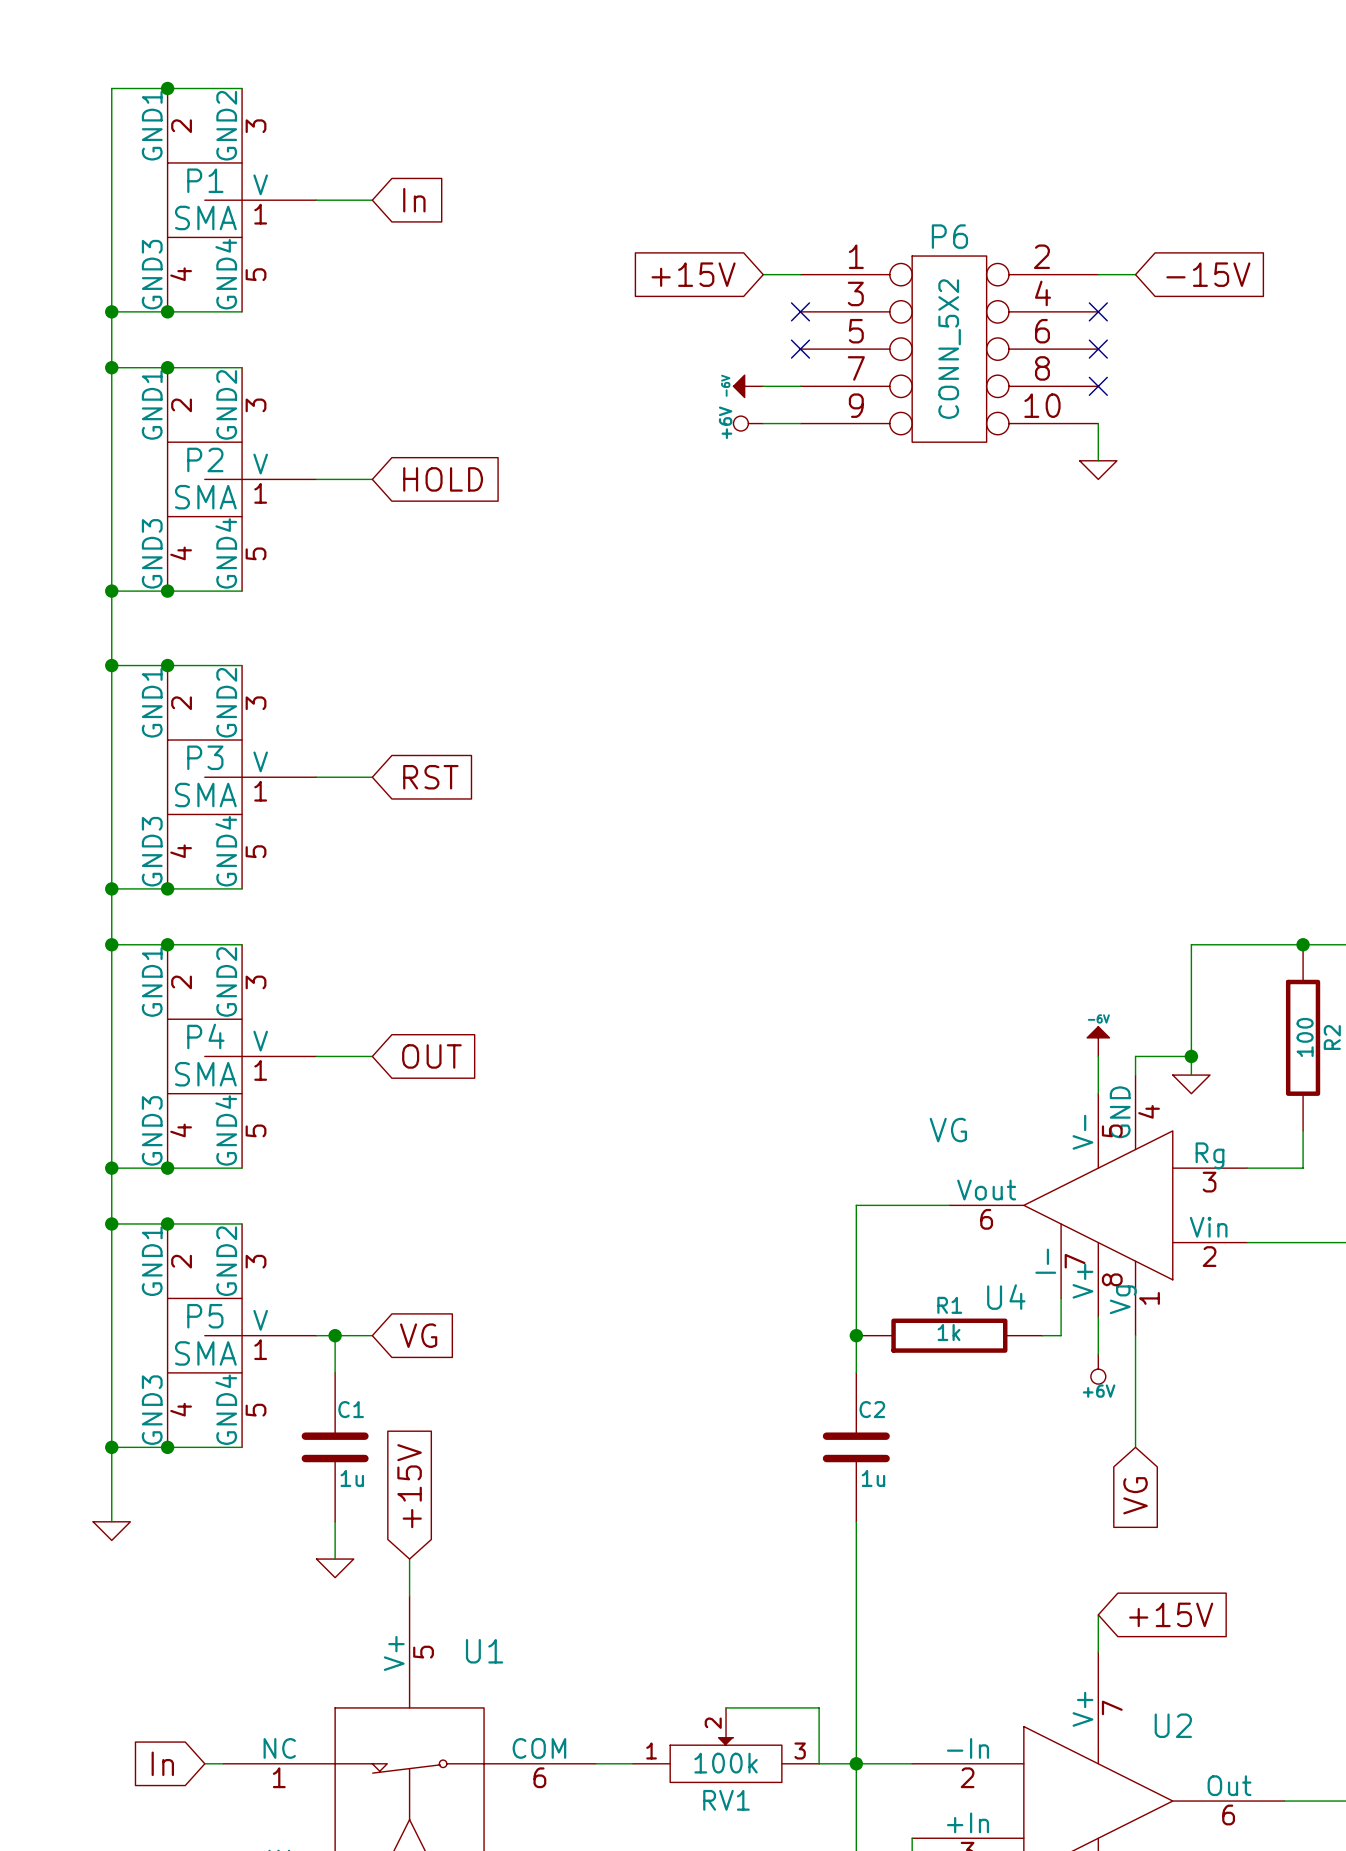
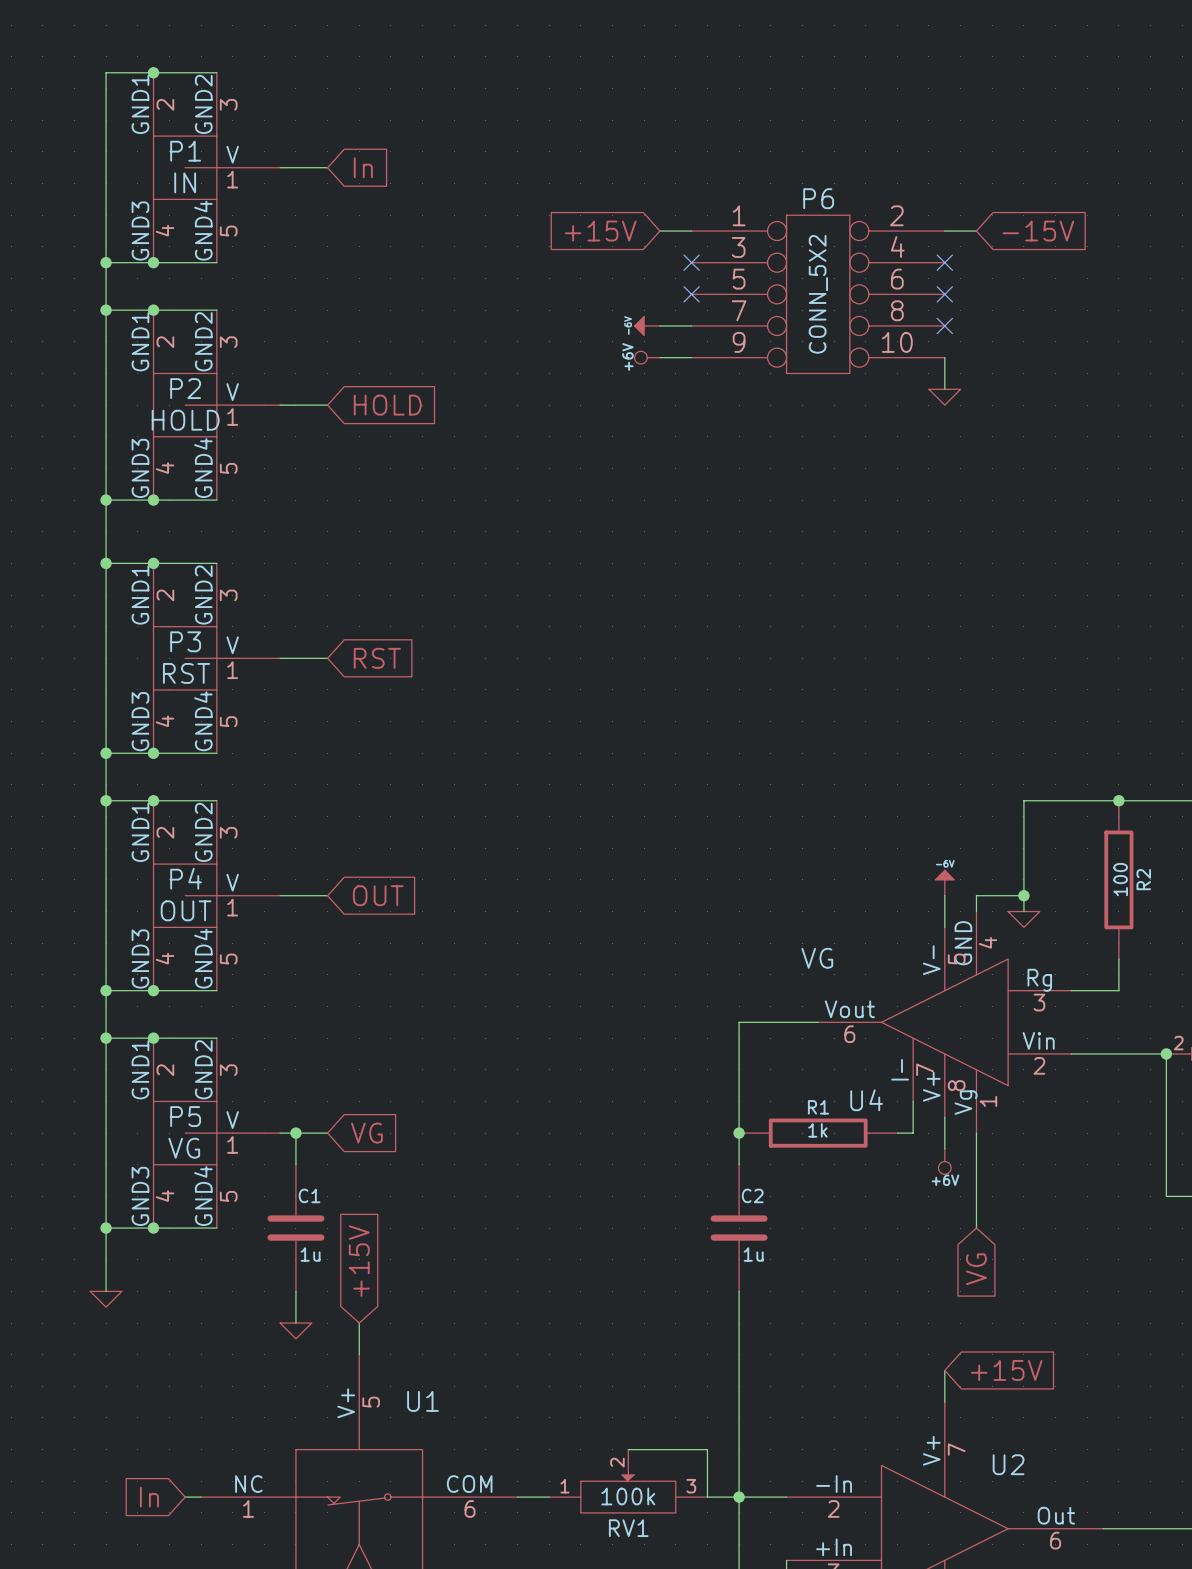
P1 value: SMA (205, 217) -> IN (185, 182)
P2 value: SMA (205, 497) -> HOLD (185, 420)
P3 value: SMA (205, 795) -> RST (186, 673)
P4 value: SMA (205, 1074) -> OUT (186, 910)
P5 value: SMA (205, 1353) -> VG (184, 1148)

